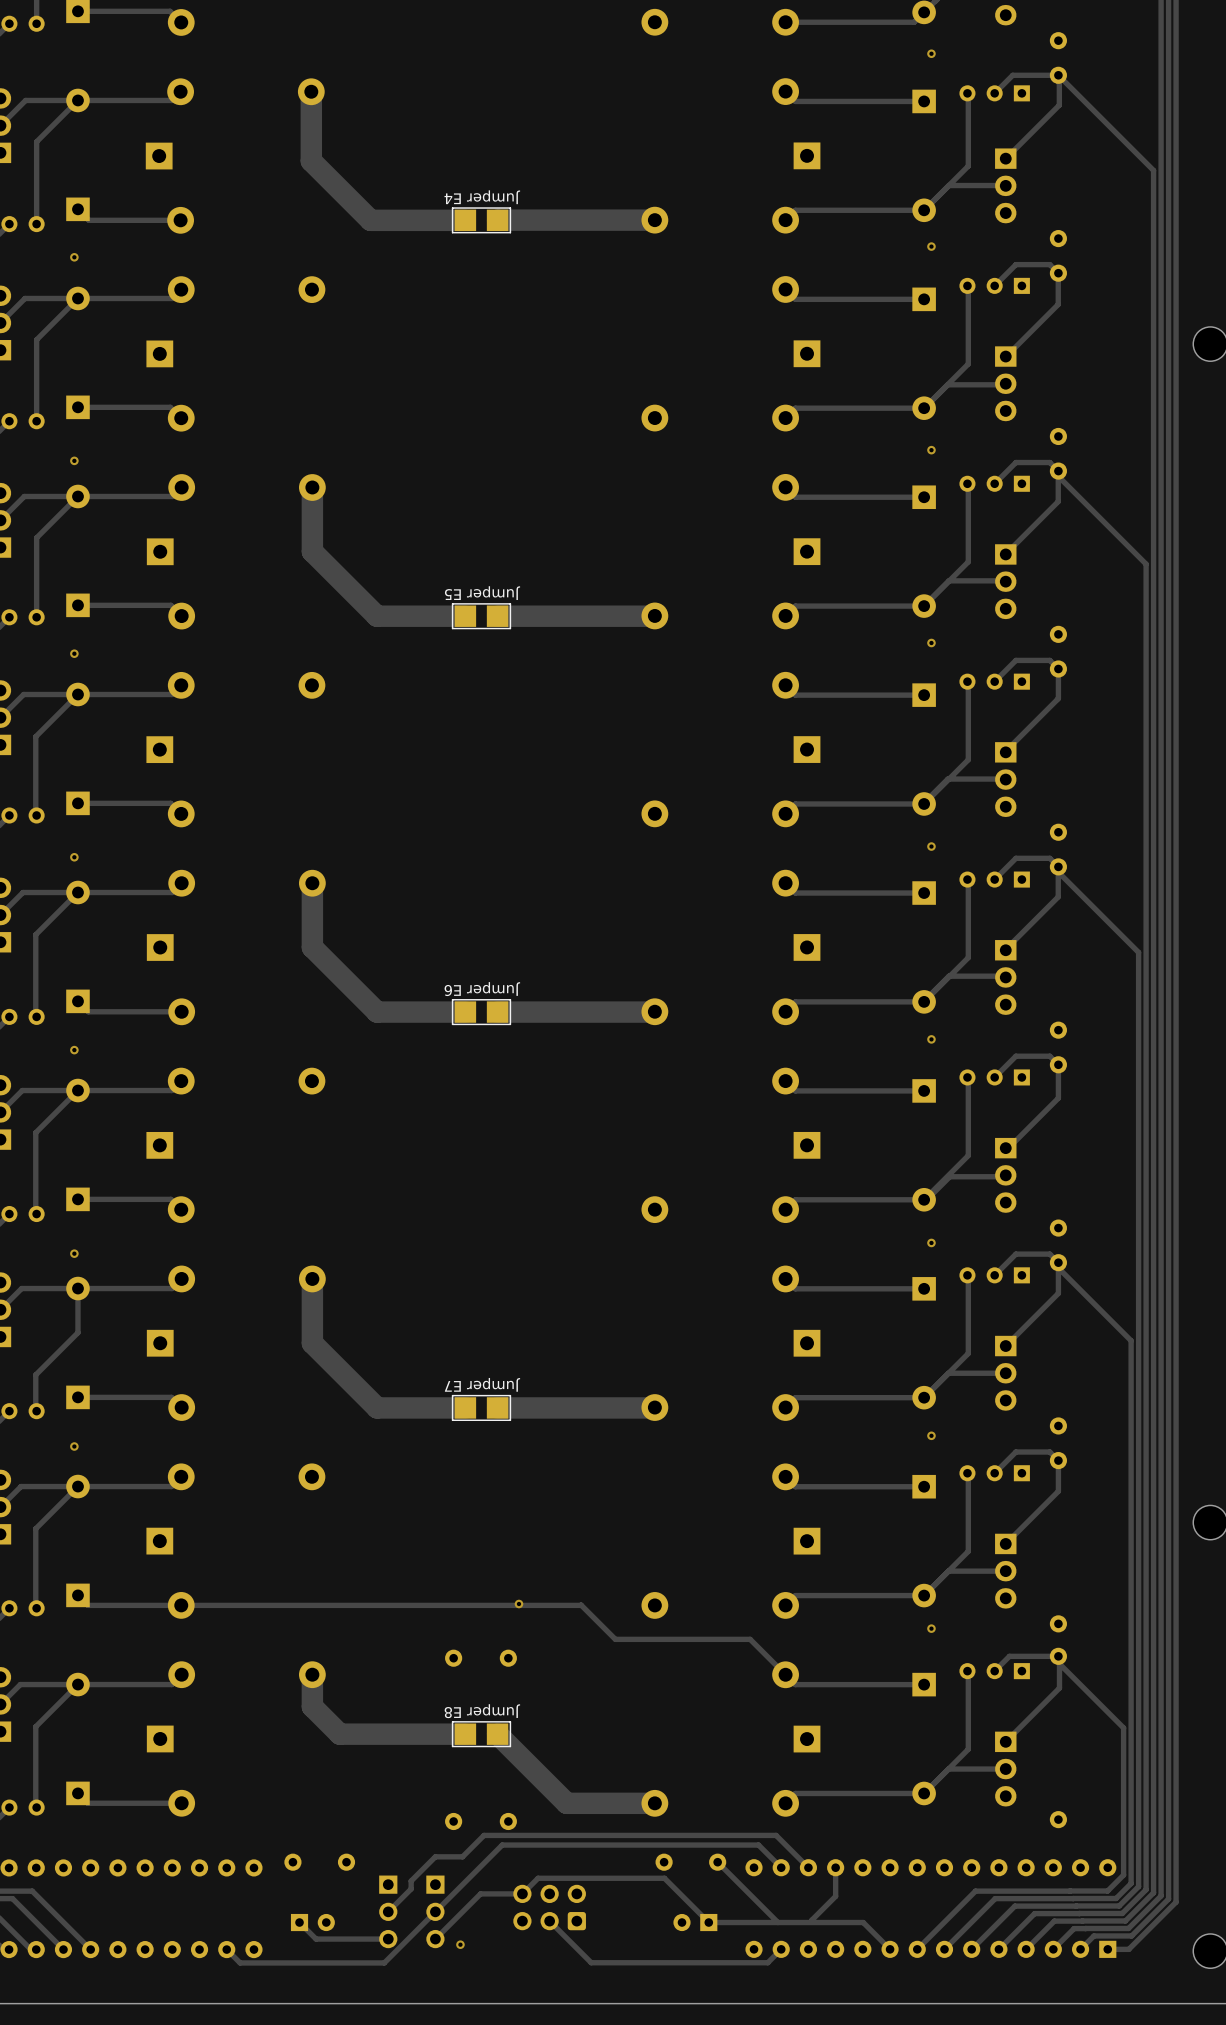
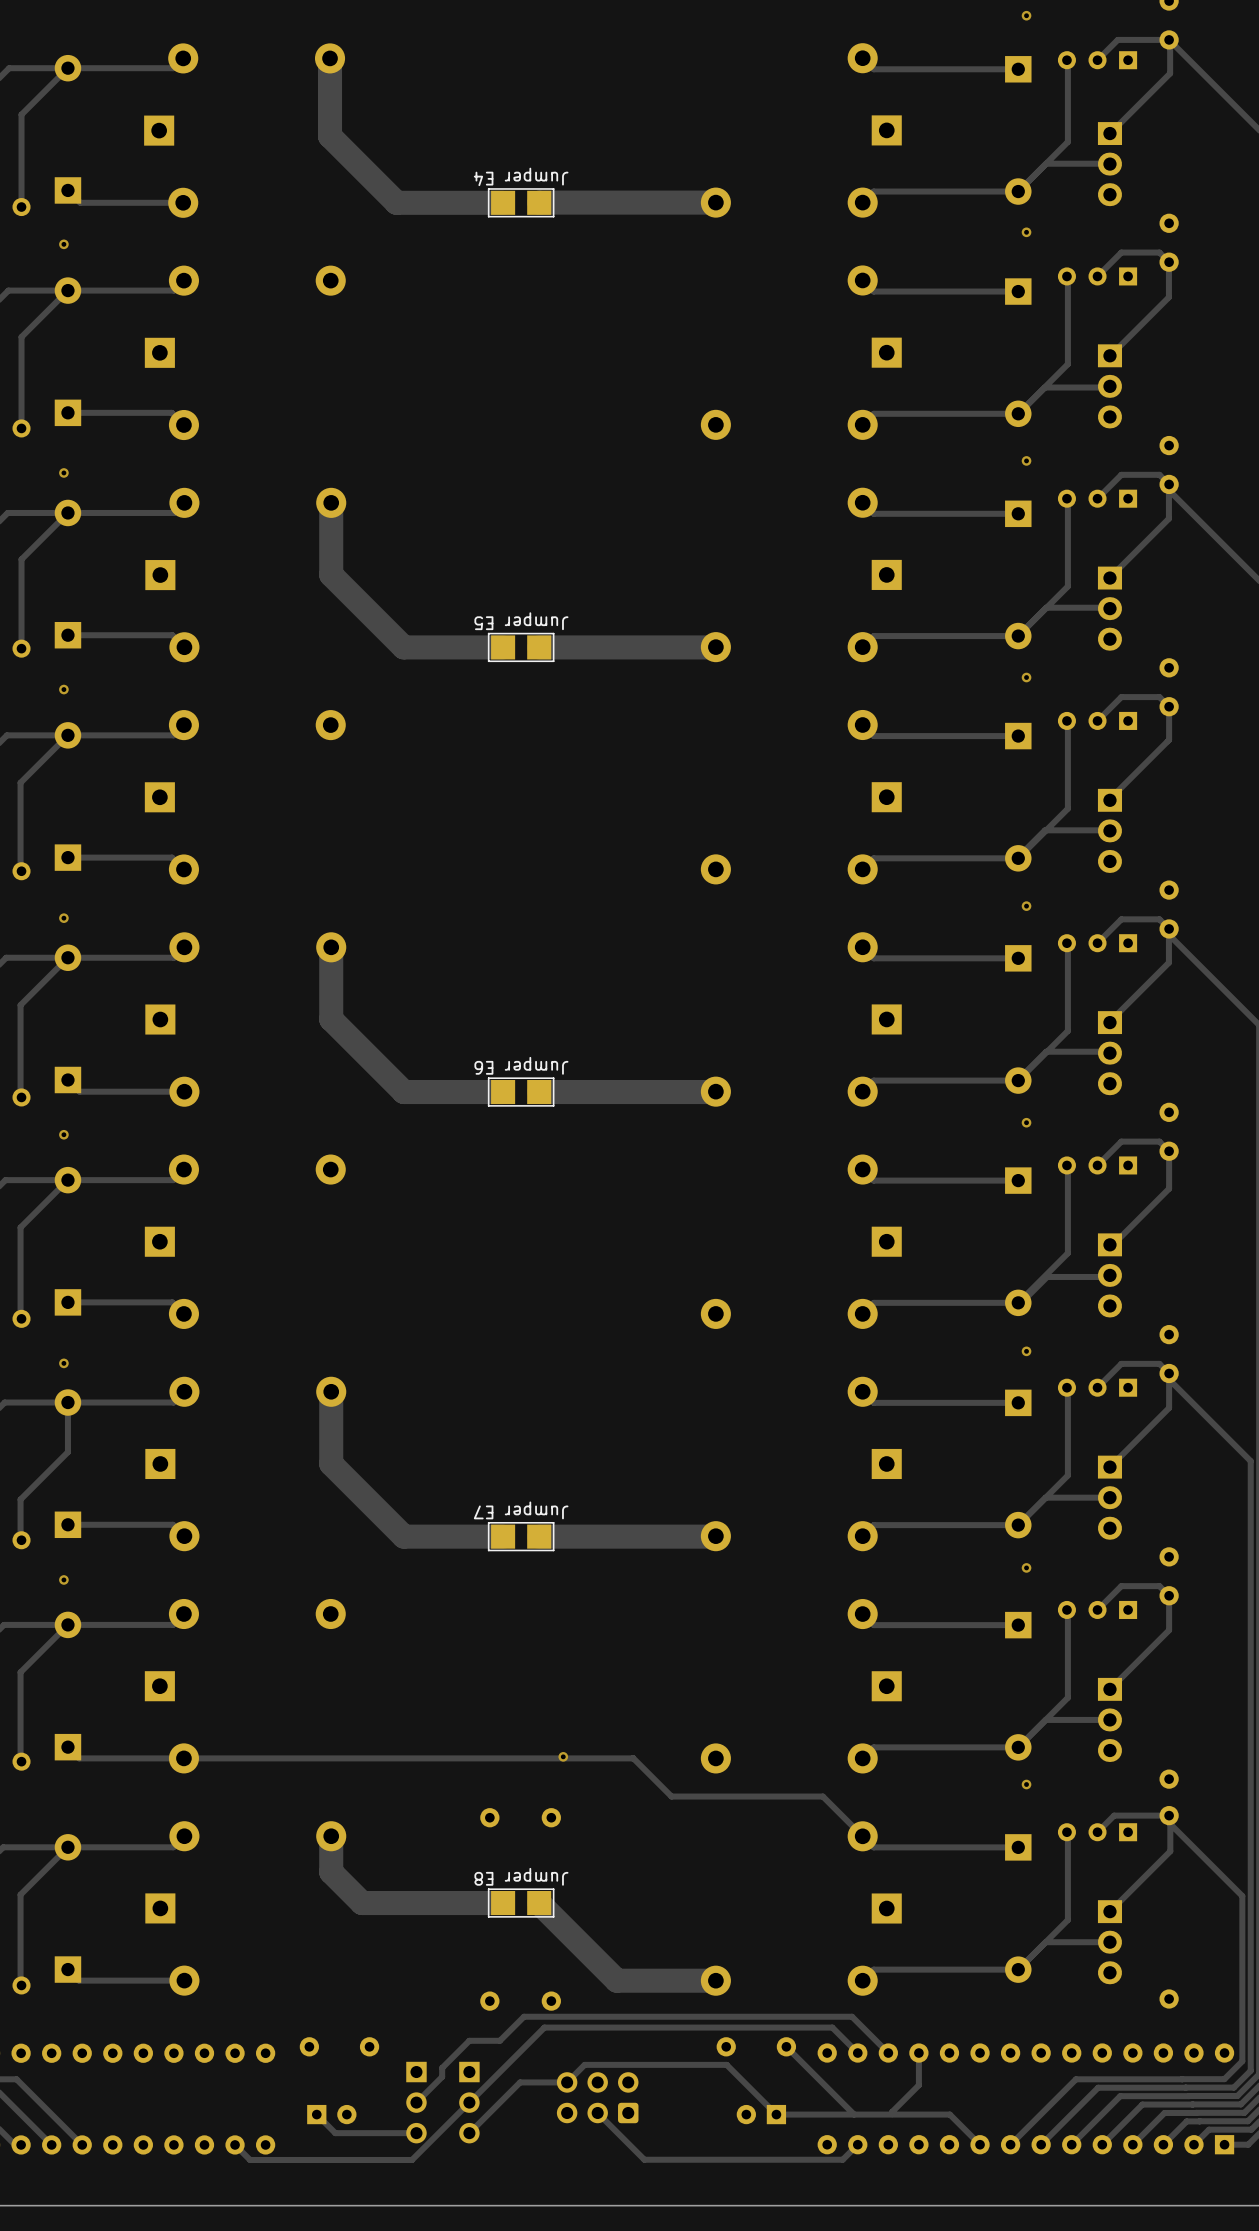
via: (460, 1944) -> none

